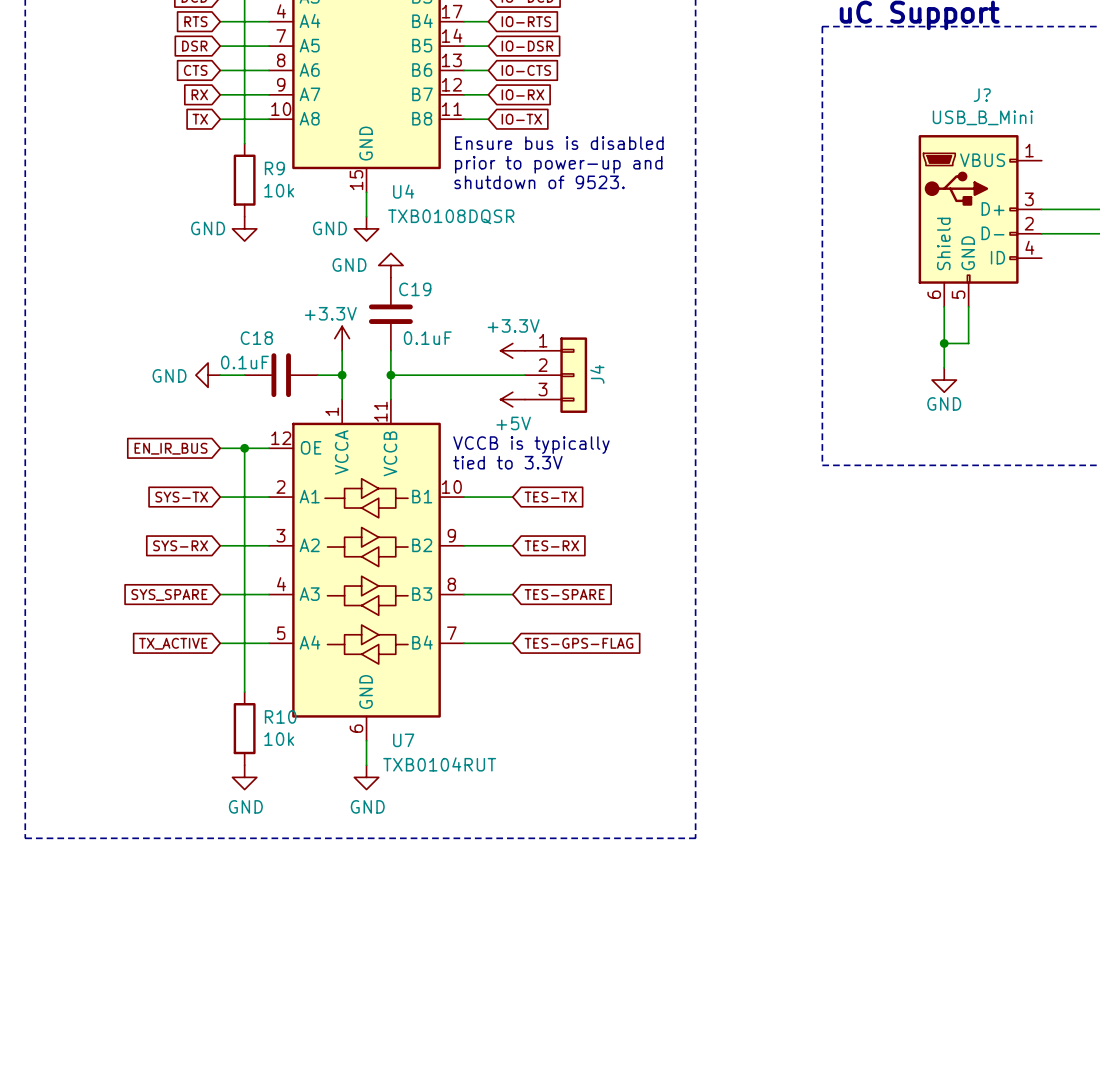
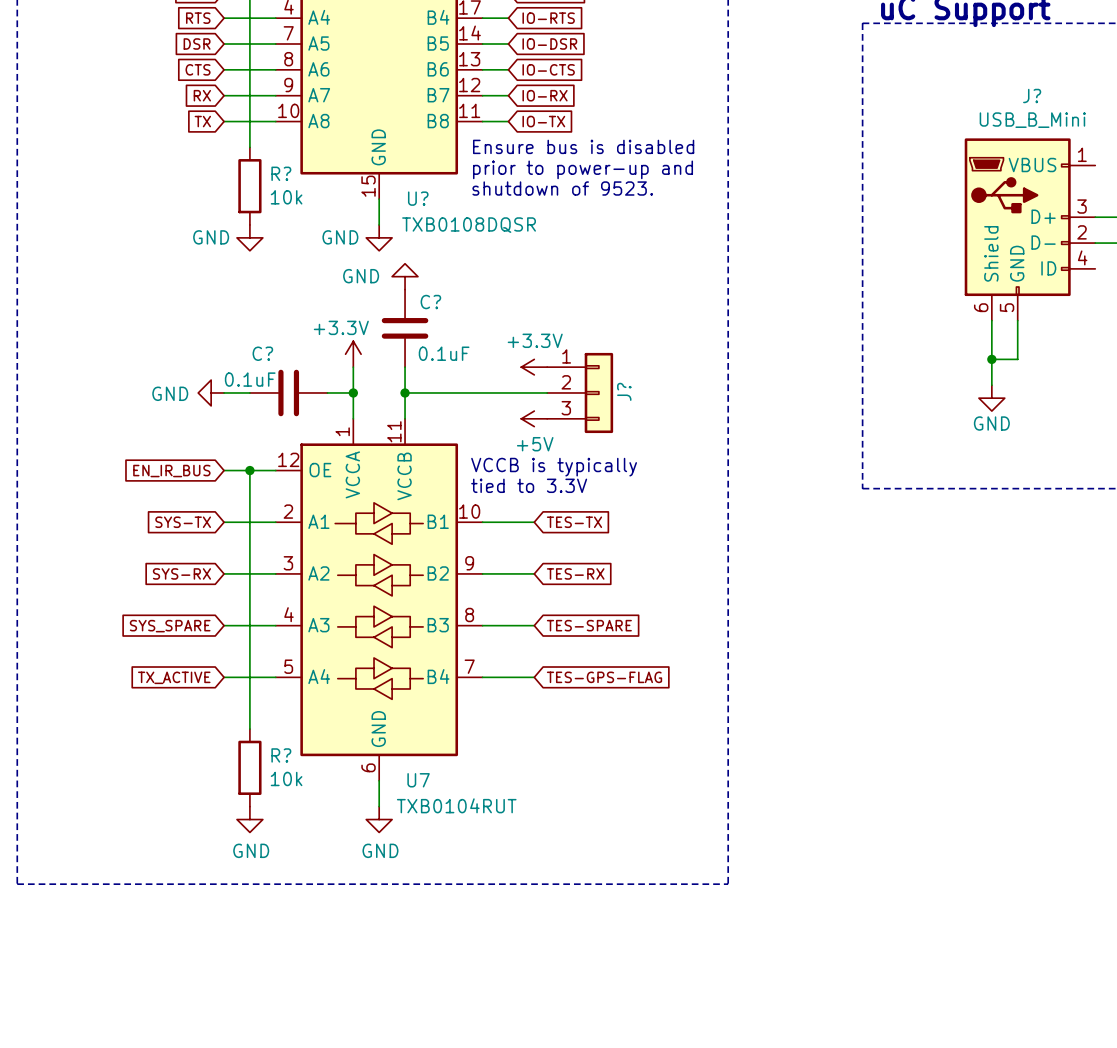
R9 name: R9 (274, 168) -> R? (281, 173)
U4 name: U4 (403, 191) -> U? (418, 198)
C19 name: C19 (415, 289) -> C? (430, 302)
C18 name: C18 (256, 338) -> C? (262, 353)
J4 name: J4 (597, 374) -> J? (624, 391)
R10 name: R10 (280, 716) -> R? (281, 755)

